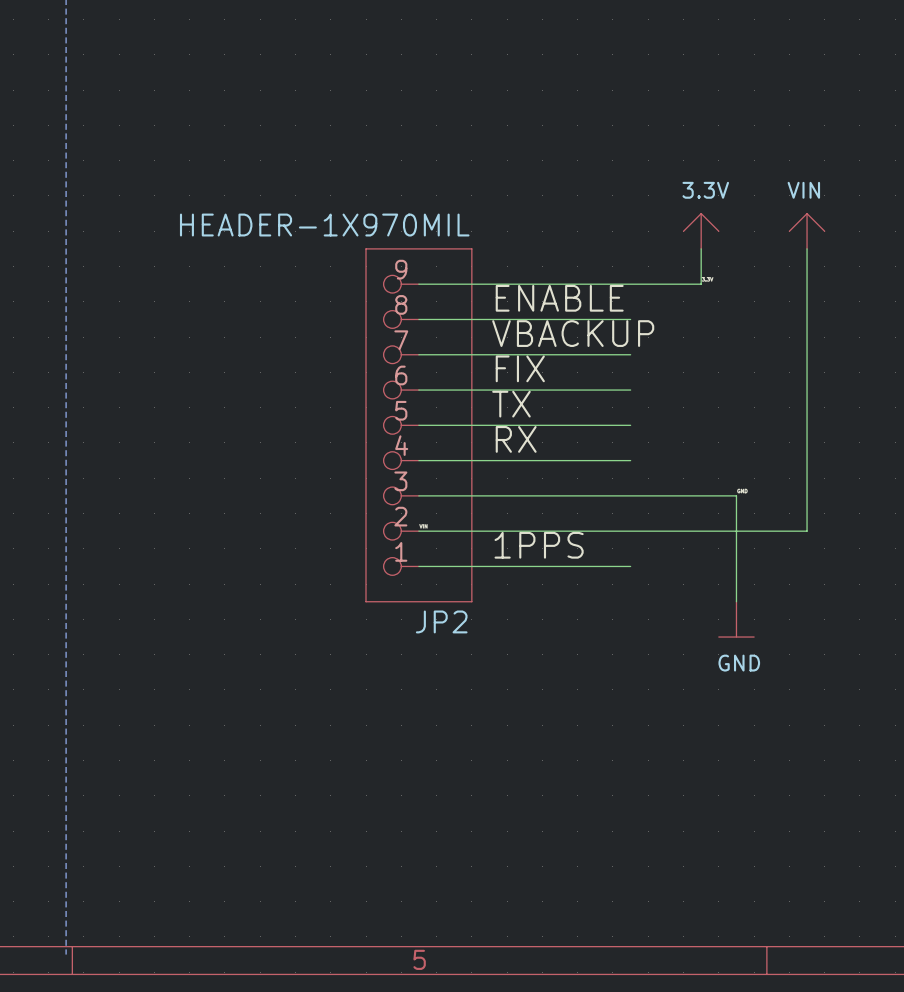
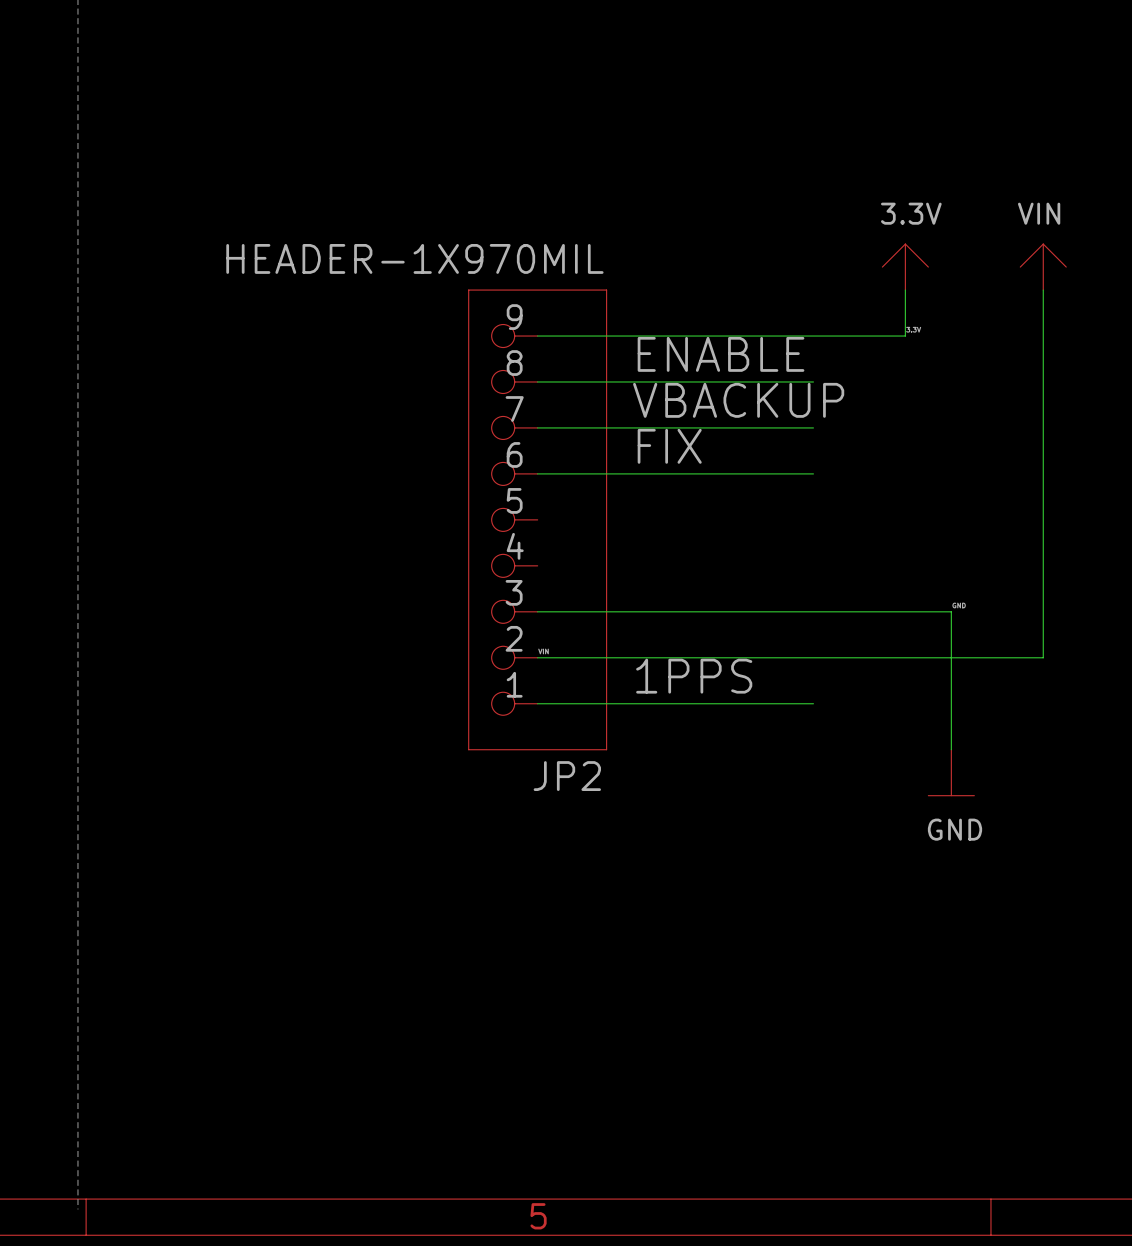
label: TX (511, 404) -> none
wire: (418, 425) (630, 425) -> none
label: RX (516, 439) -> none
wire: (418, 460) (630, 460) -> none

